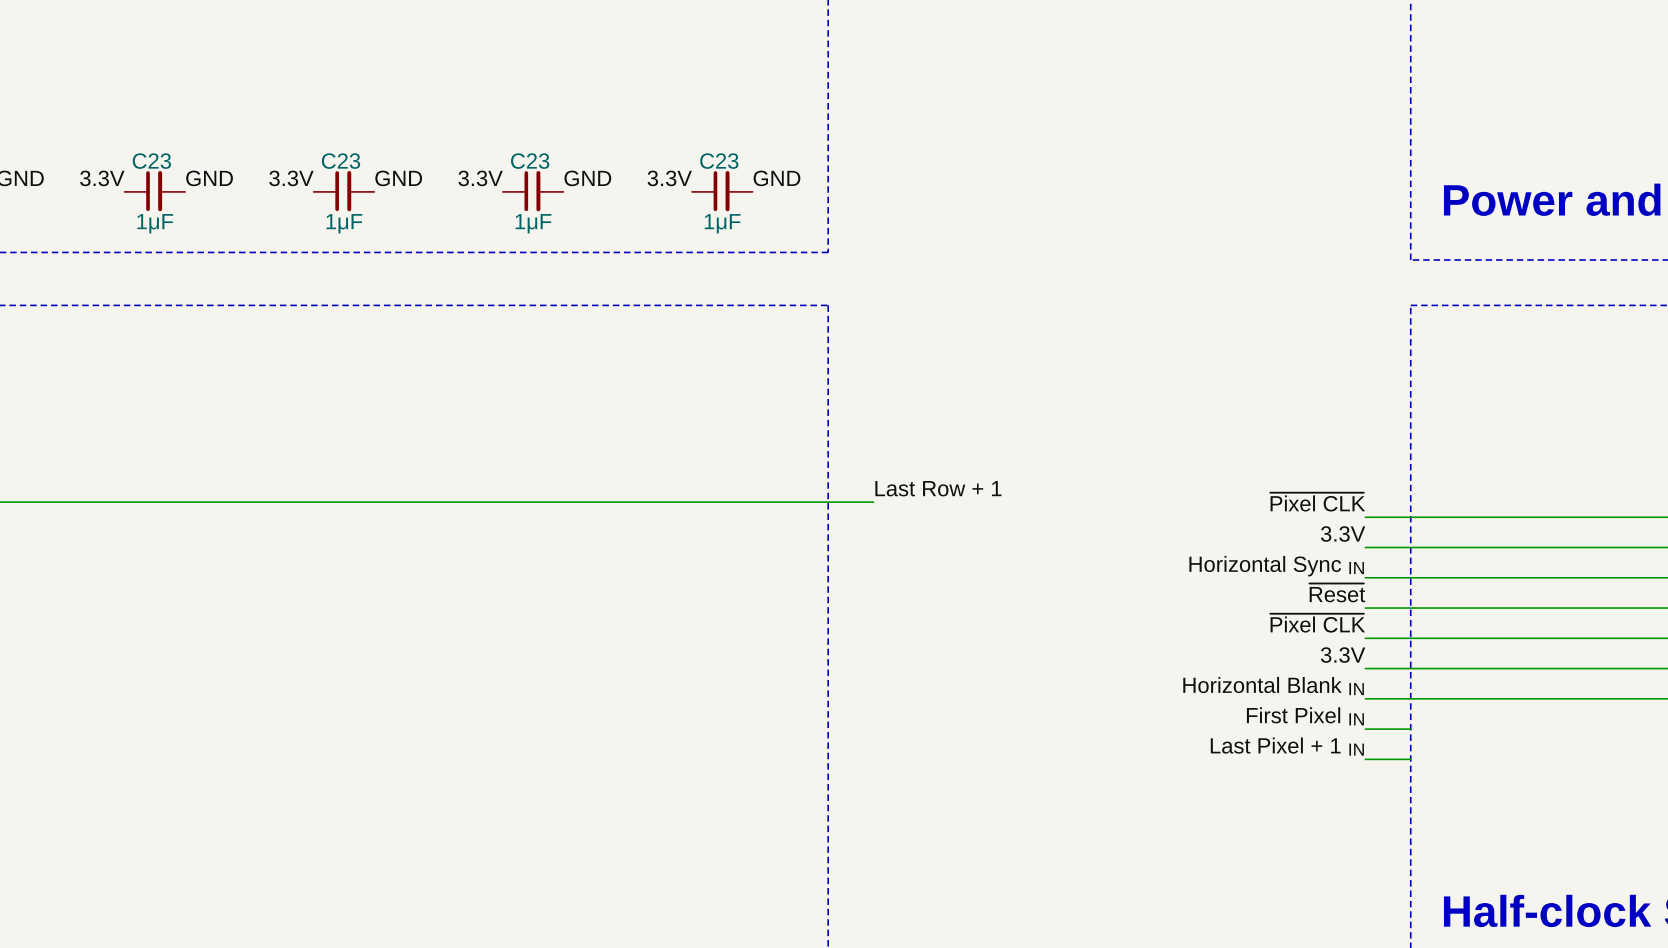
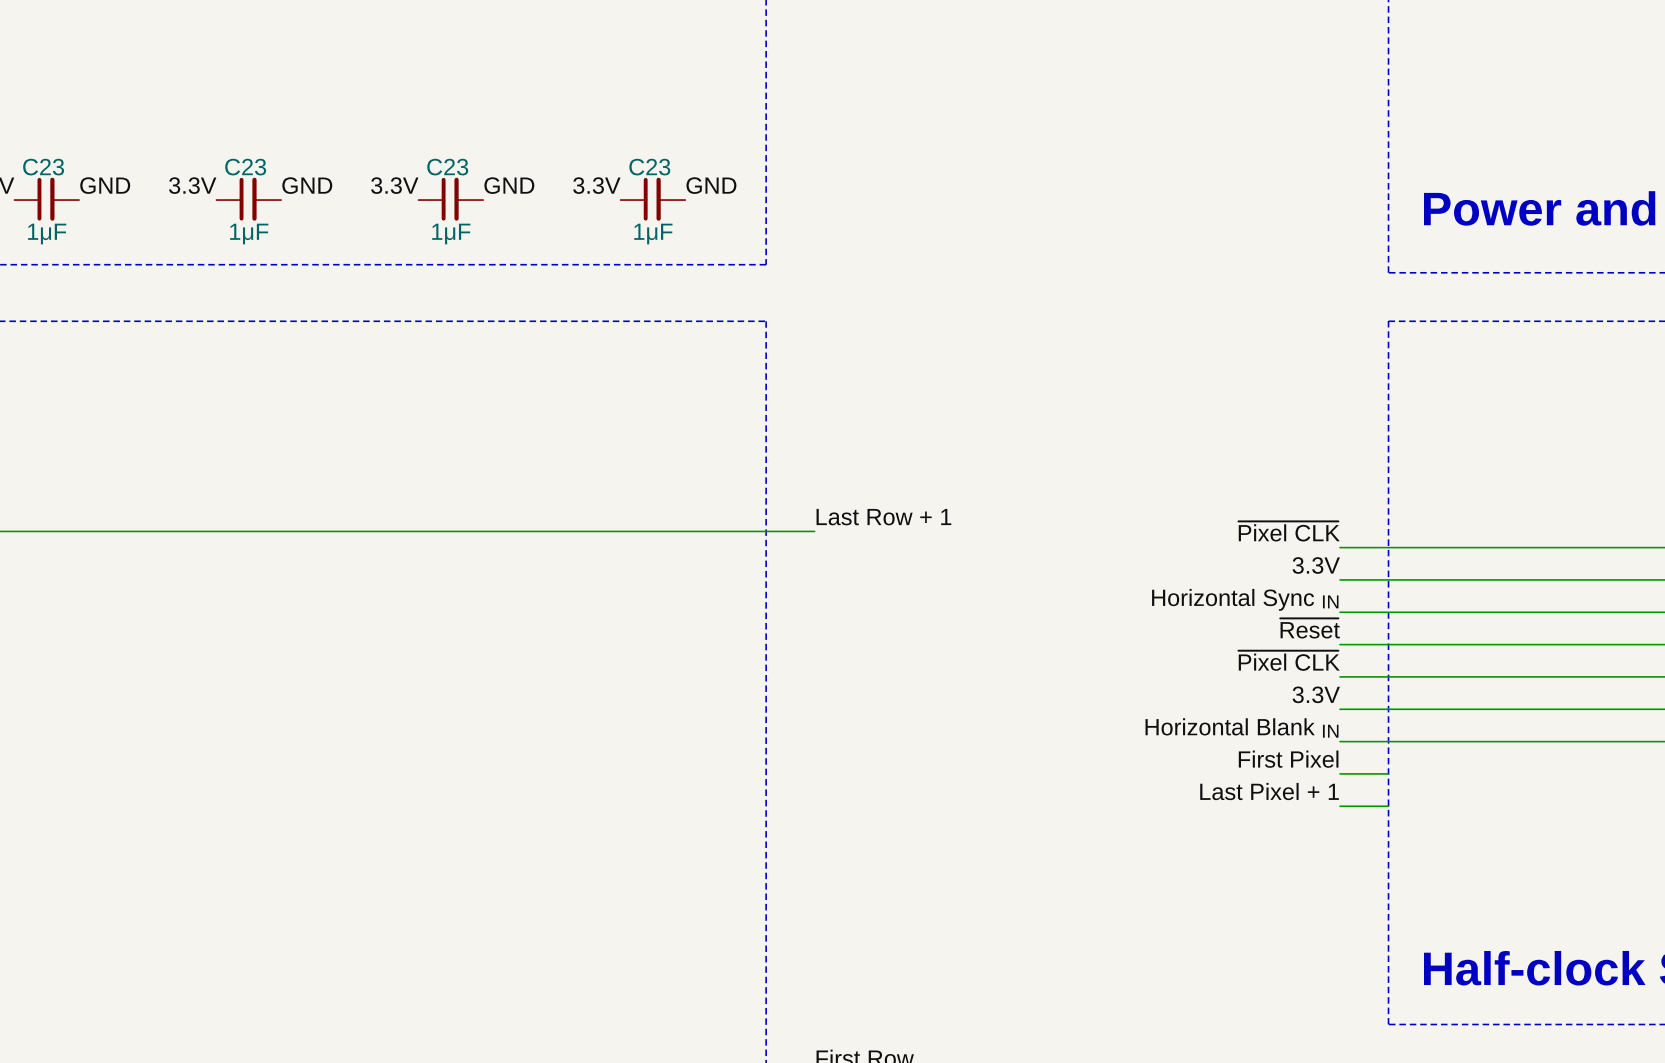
label: First Pixel IN (1305, 716) -> First Pixel (1288, 759)
label: Last Pixel + 1 IN (1287, 746) -> Last Pixel + 1 (1269, 791)

